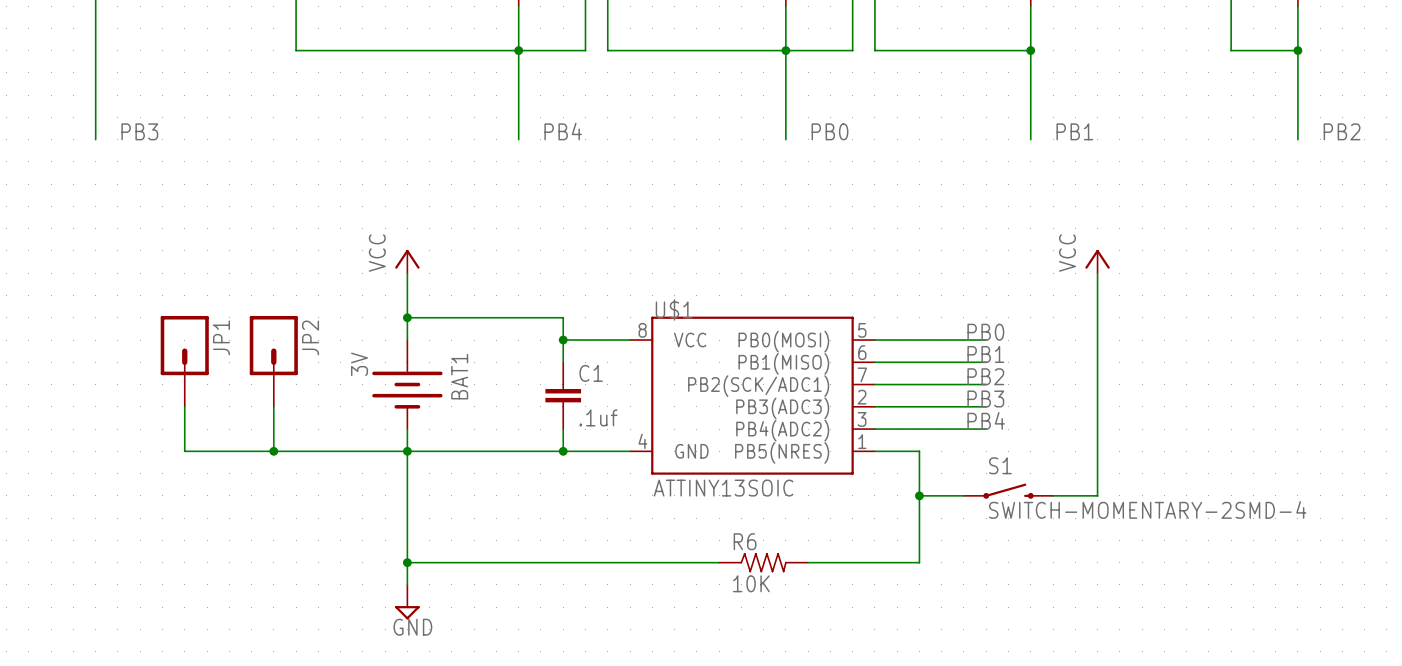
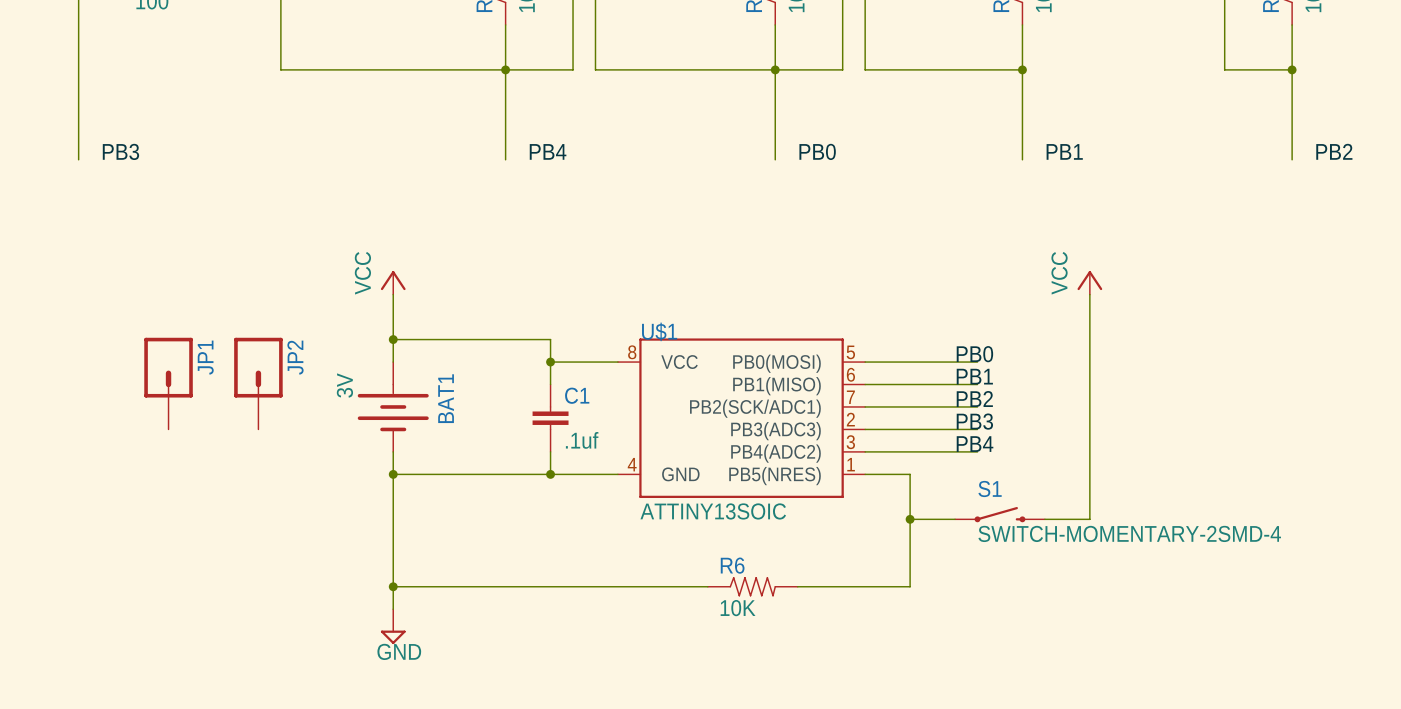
wire: (184, 406) (184, 451) (407, 451) -> none
wire: (273, 406) (273, 451) -> none
junction: (273, 451) -> none

